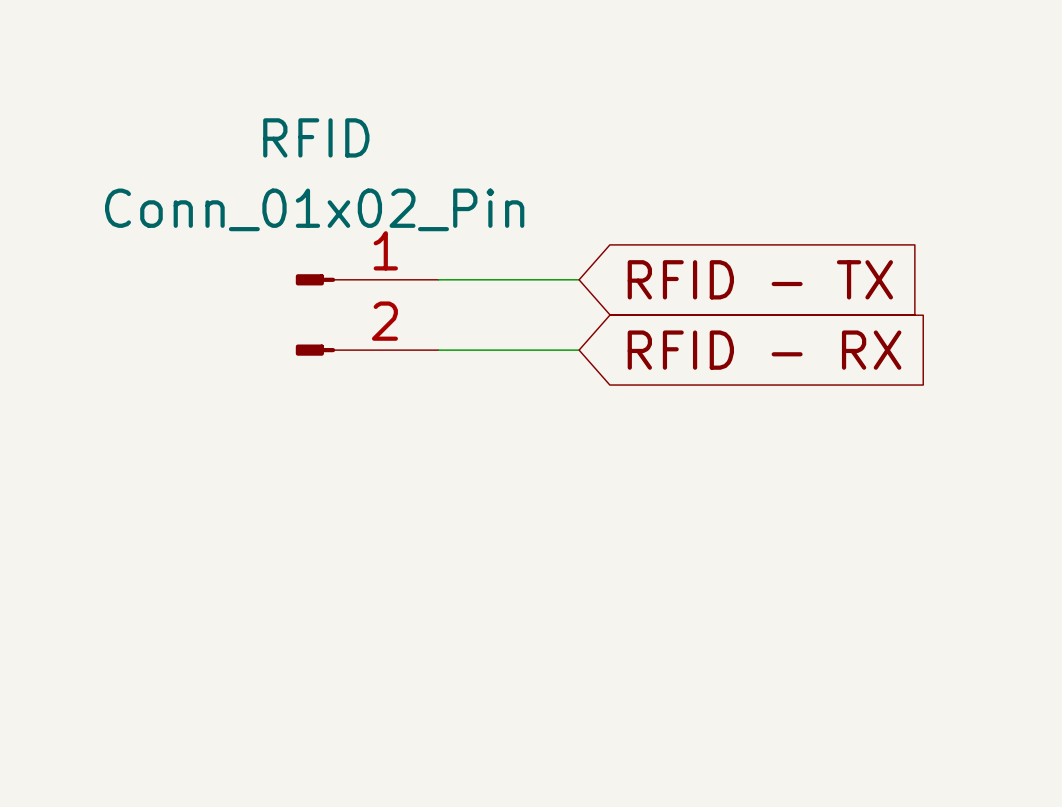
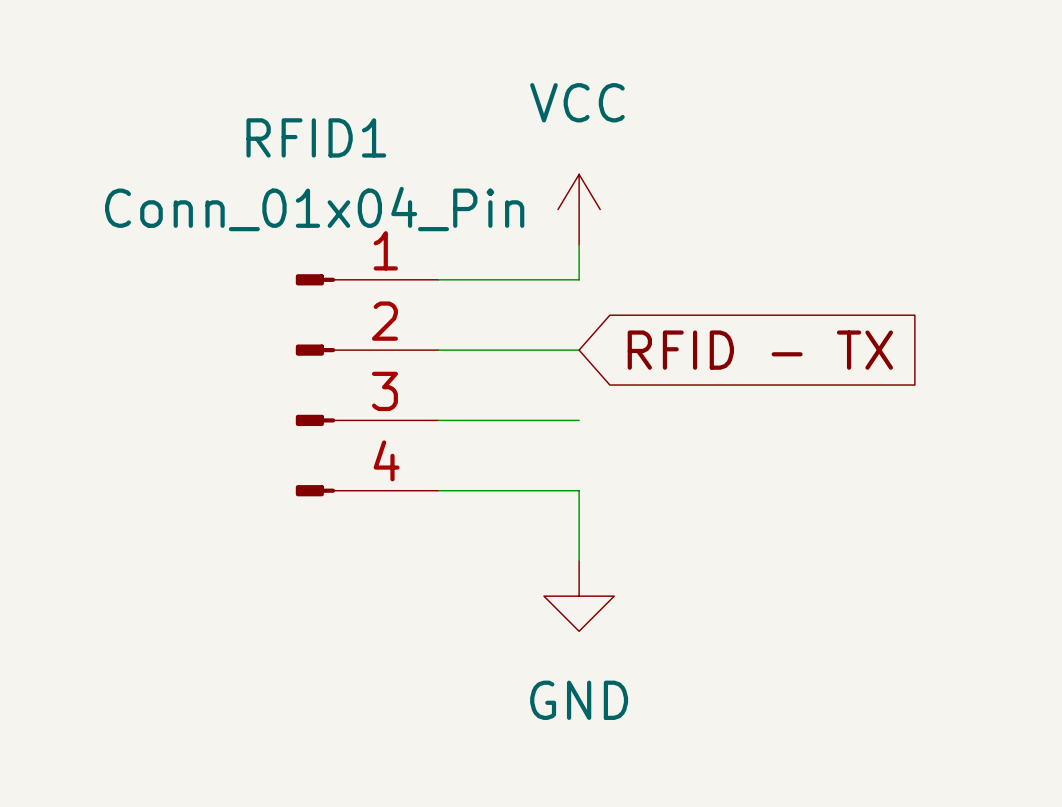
power symbol: none -> VCC (579, 209)
wire: none -> (579, 244) (579, 279)
global label: RFID - TX (760, 279) -> none
RFID: Conn_01x02_Pin (367, 314) -> none
global label: RFID - RX (764, 350) -> RFID - TX (760, 350)
RFID1: none -> Conn_01x04_Pin (367, 385)
wire: none -> (438, 420) (579, 420)
wire: none -> (438, 490) (579, 490) (579, 561)
power symbol: none -> GND (579, 596)

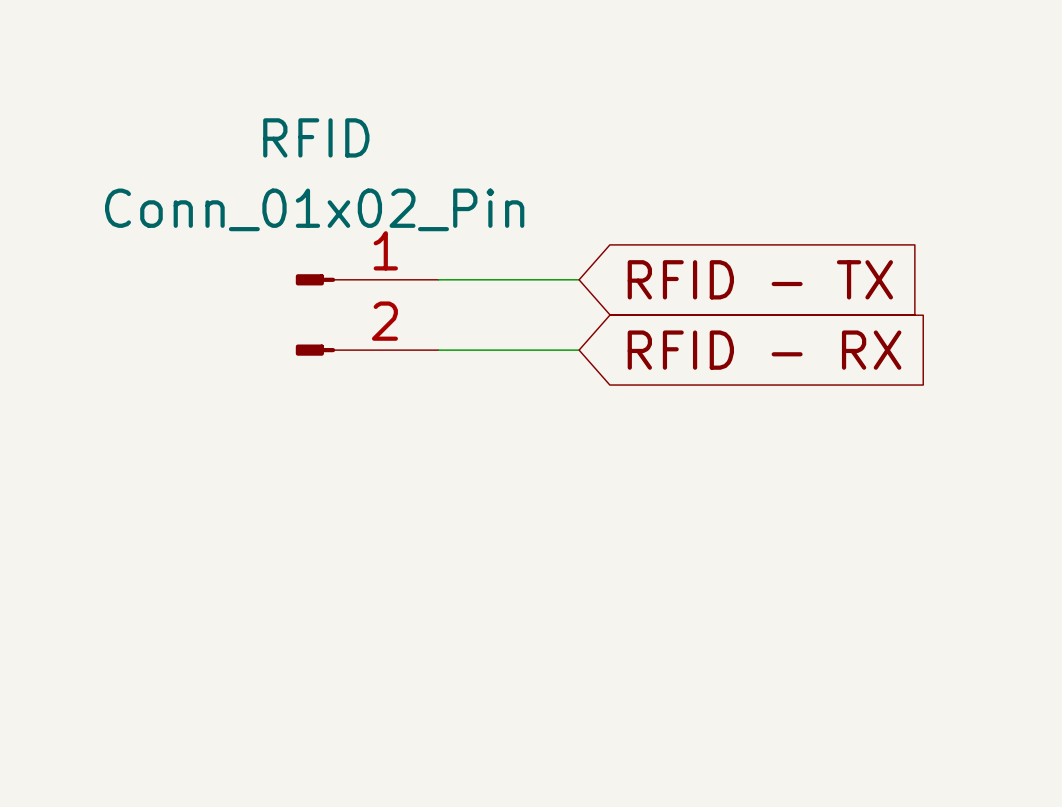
power symbol: VCC (579, 209) -> none
wire: (579, 244) (579, 279) -> none
global label: none -> RFID - TX (760, 279)
RFID: none -> Conn_01x02_Pin (367, 314)
global label: RFID - TX (760, 350) -> RFID - RX (764, 350)
RFID1: Conn_01x04_Pin (367, 385) -> none
wire: (438, 420) (579, 420) -> none
wire: (438, 490) (579, 490) (579, 561) -> none
power symbol: GND (579, 596) -> none

